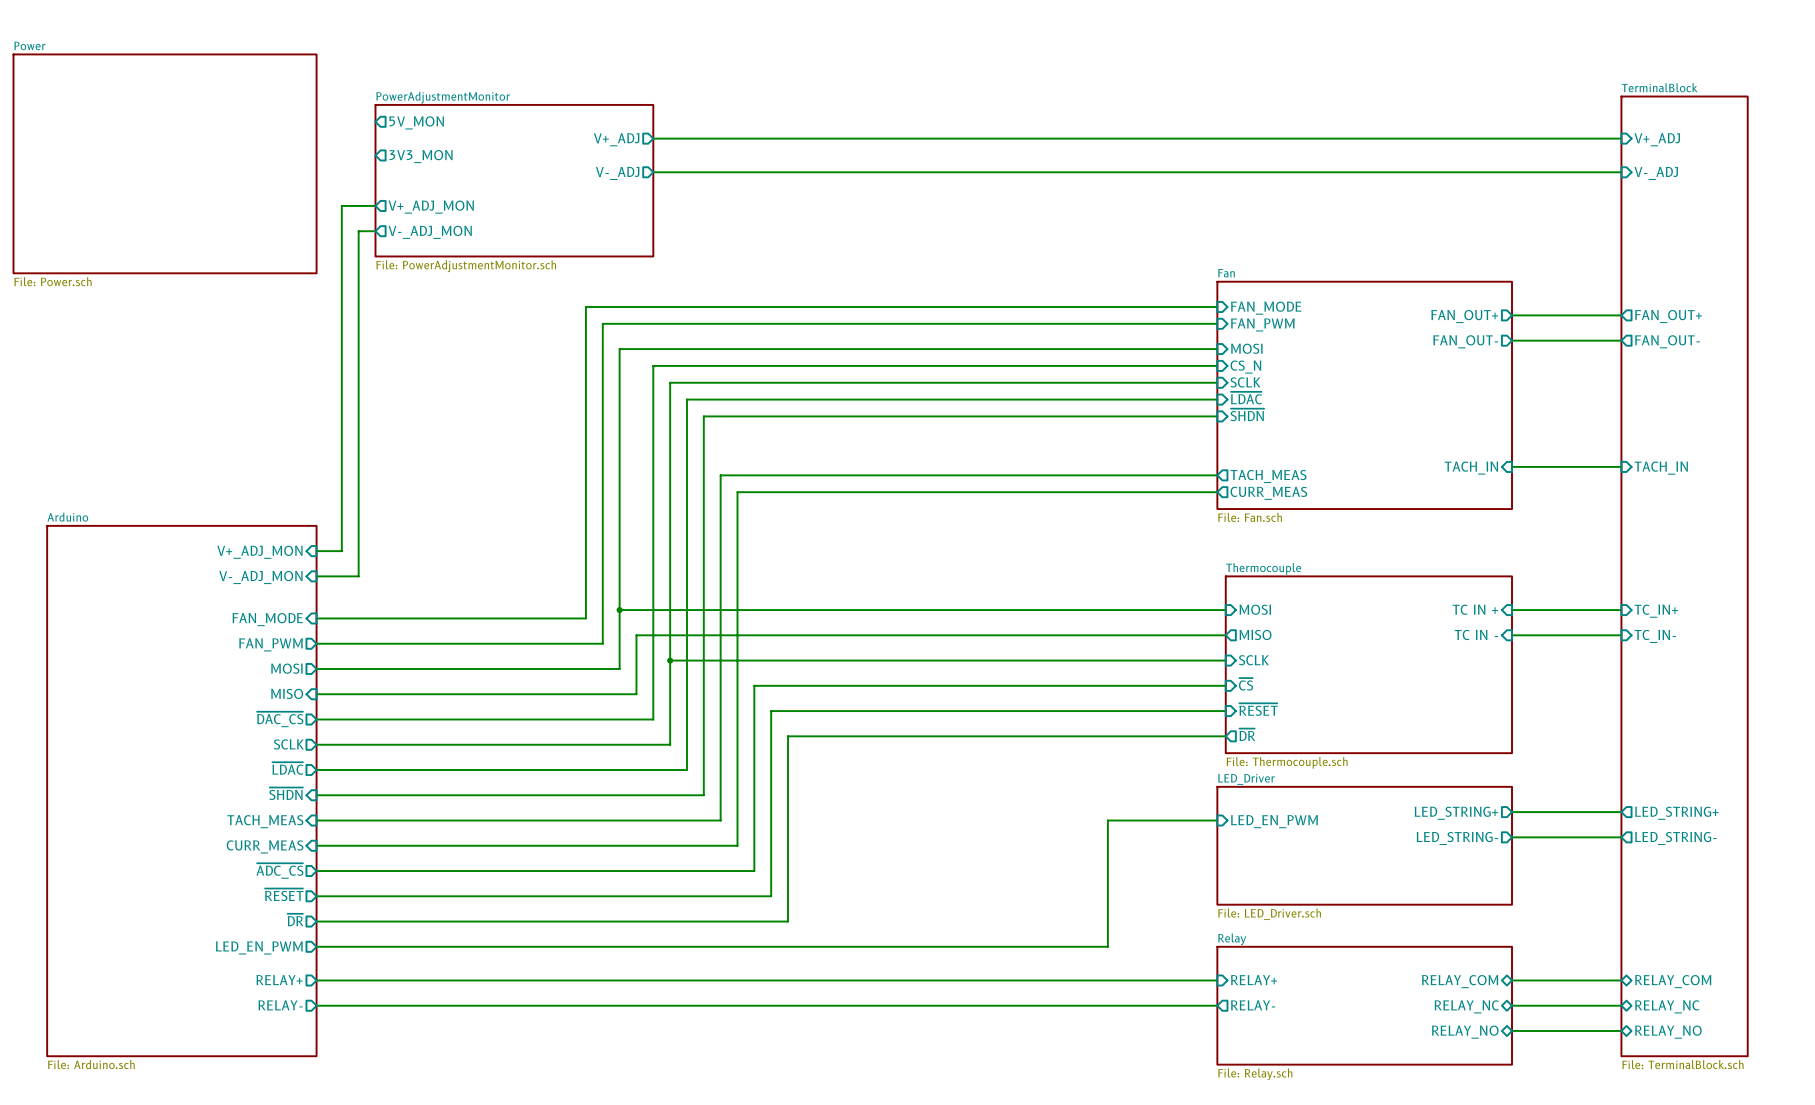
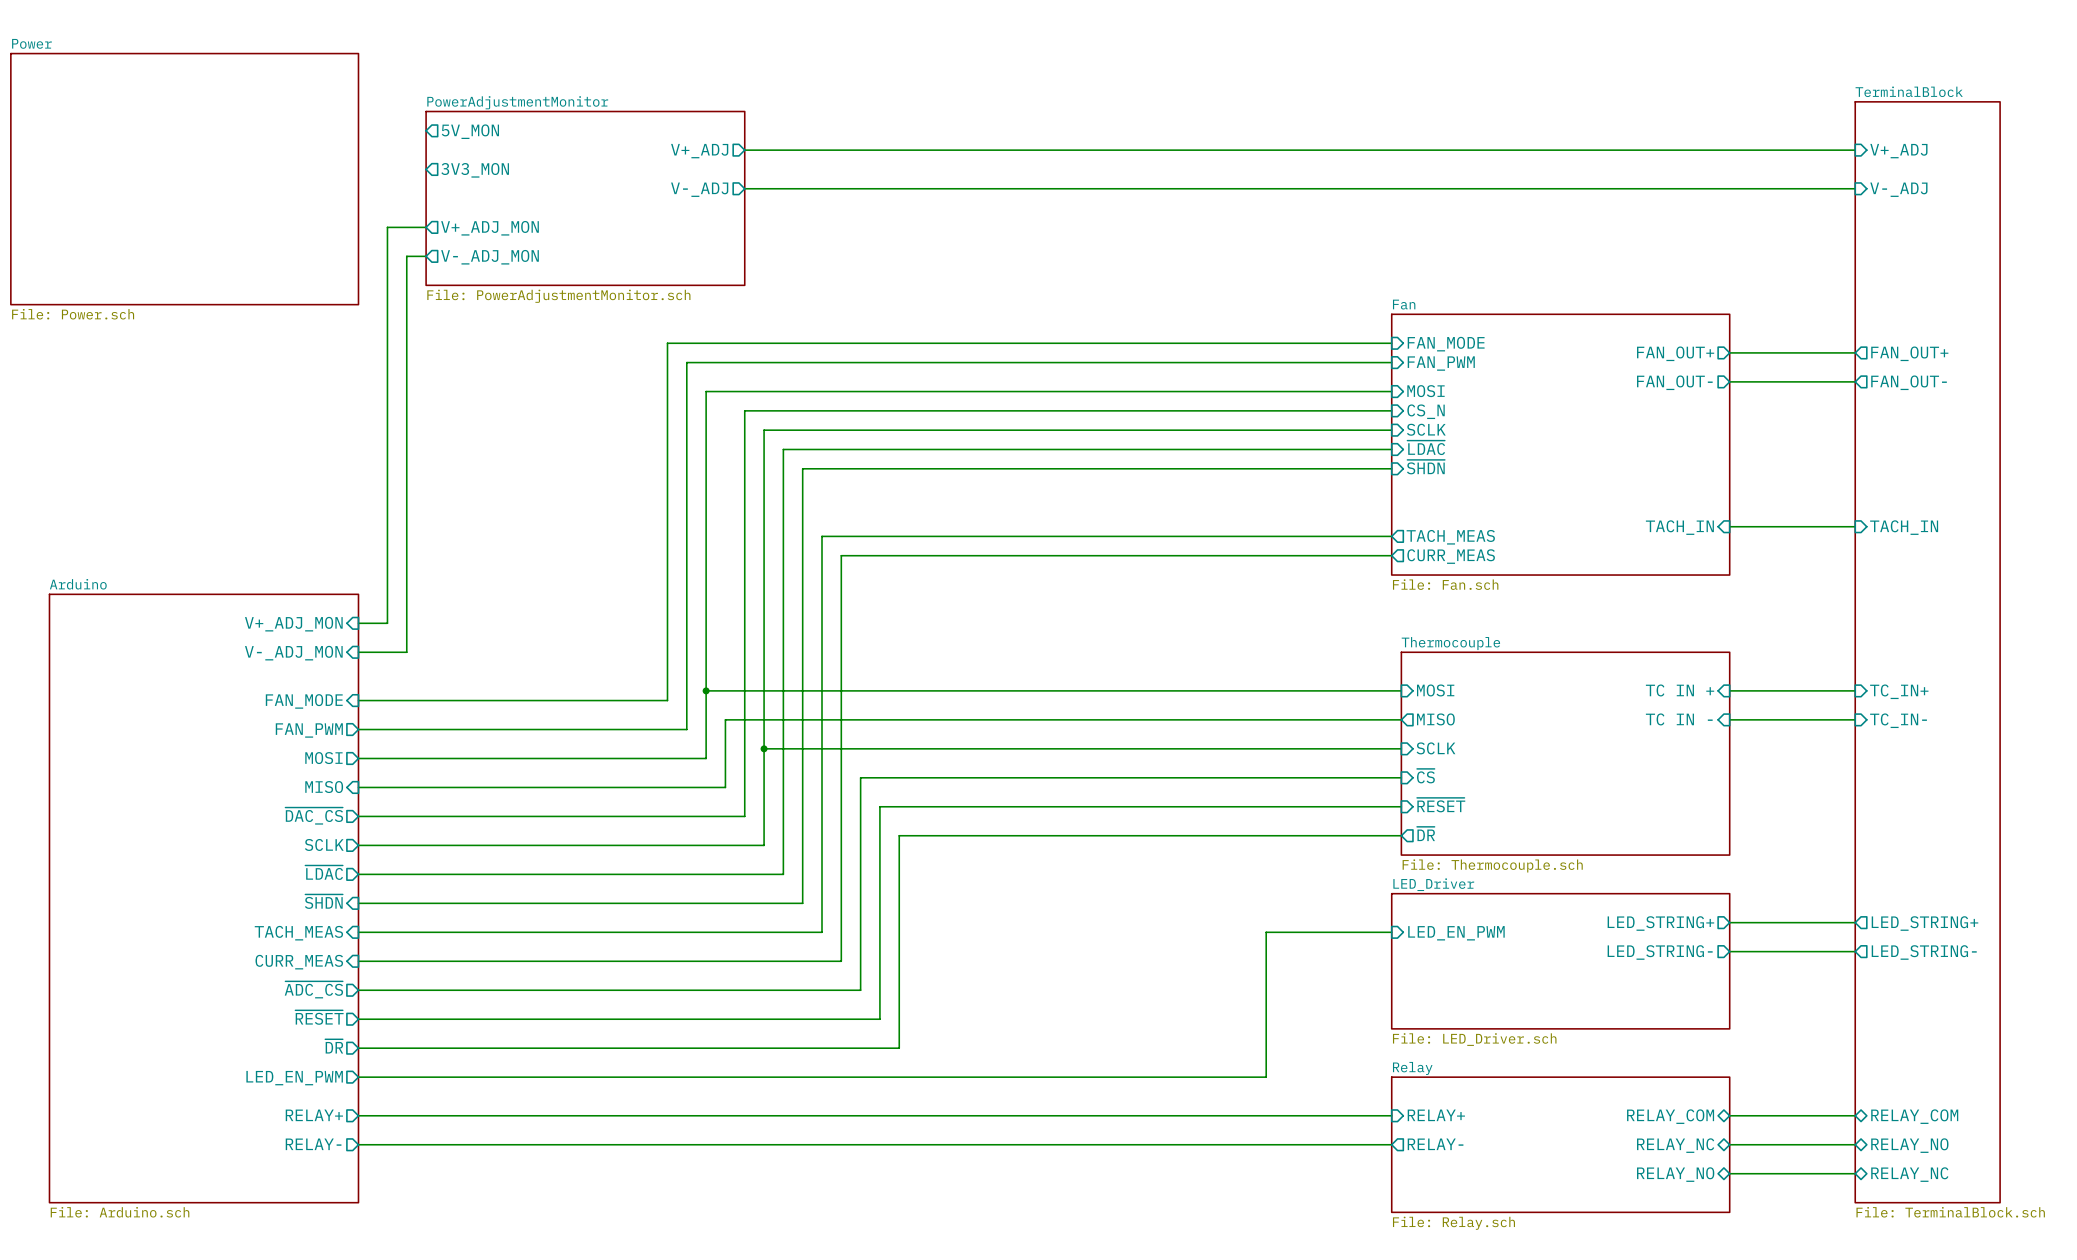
sheet pin: RELAY_NC (1667, 1006) -> RELAY_NO (1909, 1145)
sheet pin: RELAY_NO (1668, 1032) -> RELAY_NC (1909, 1174)

